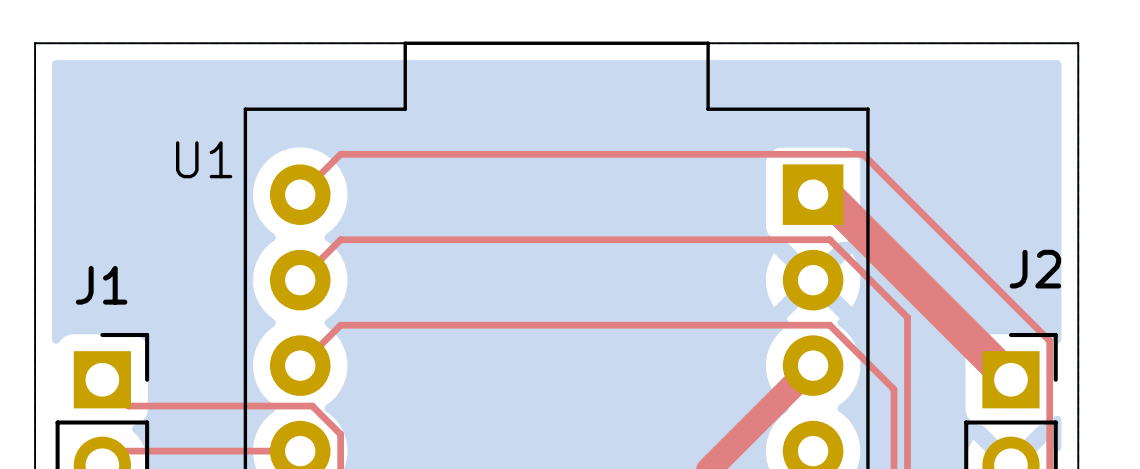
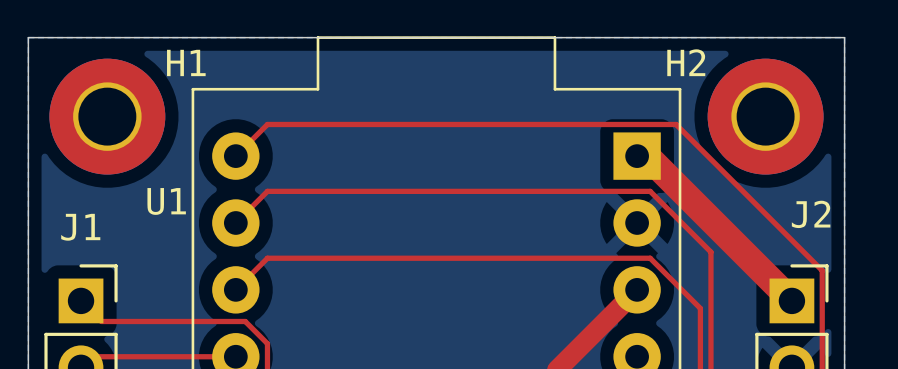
H1: none -> (107, 116)
H2: none -> (765, 116)
U1 name position: U1 (204, 159) -> U1 (166, 201)

